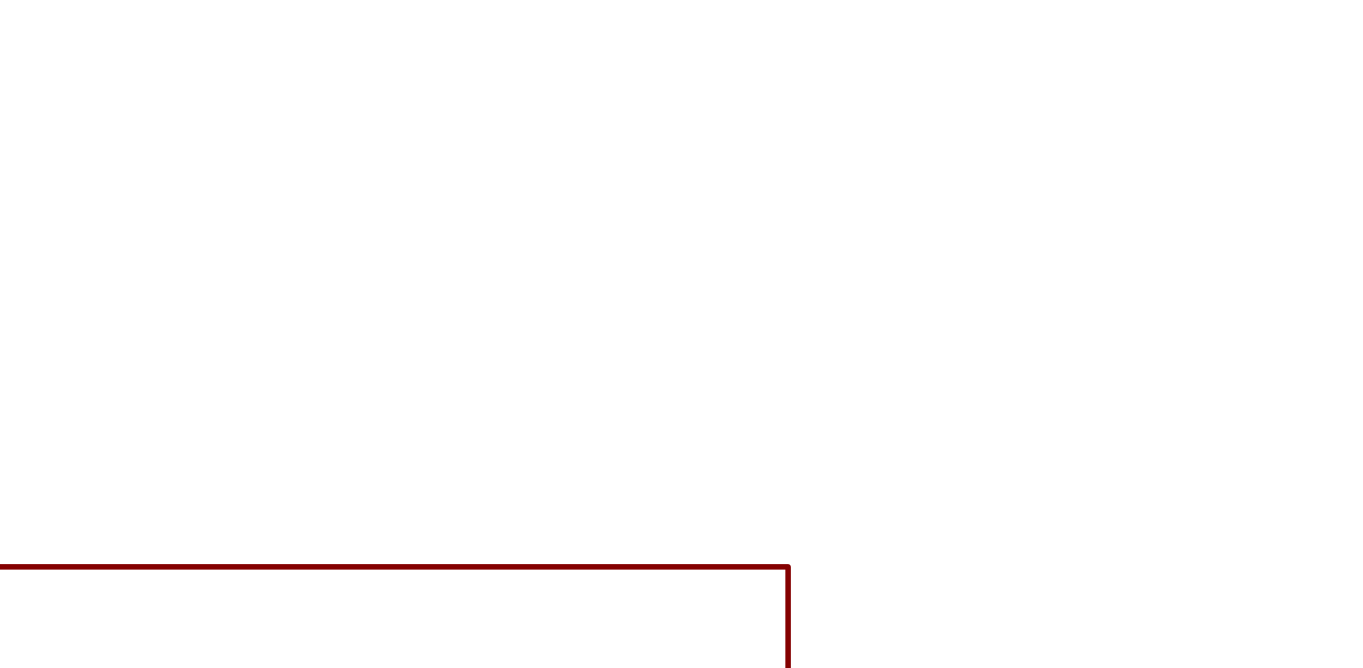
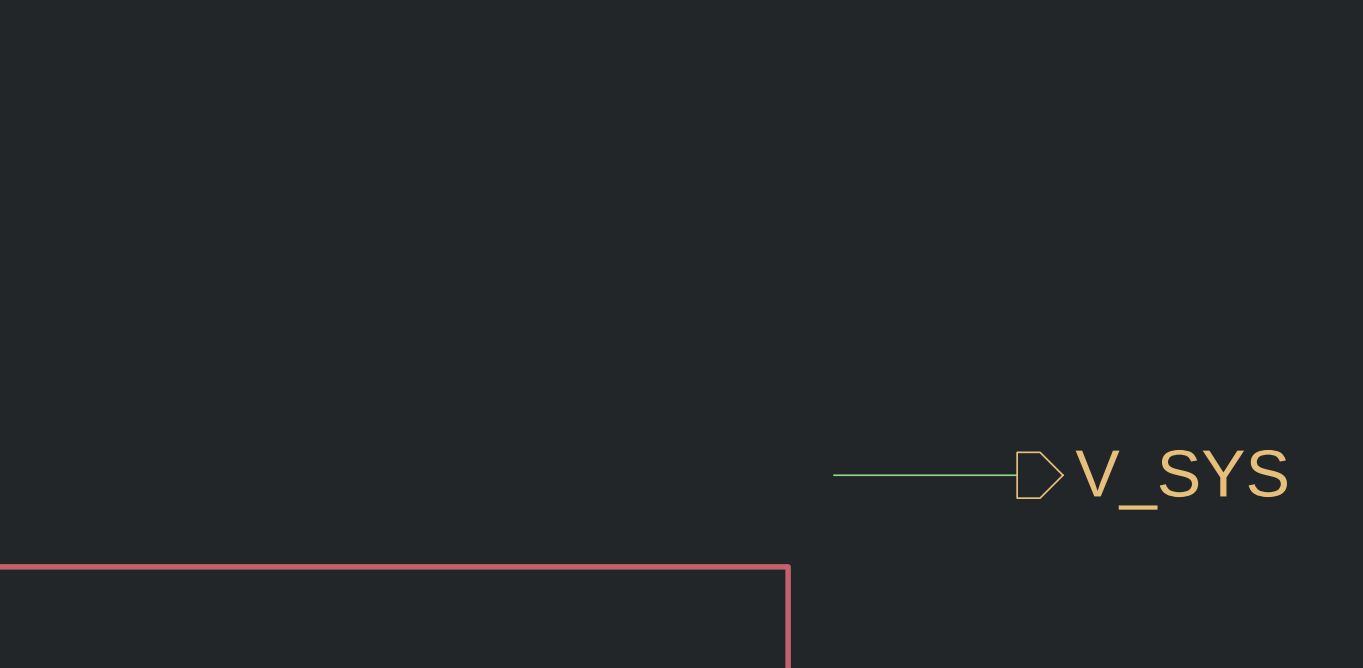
wire: none -> (833, 475) (1017, 475)
hierarchical label: none -> V_SYS (1181, 479)

